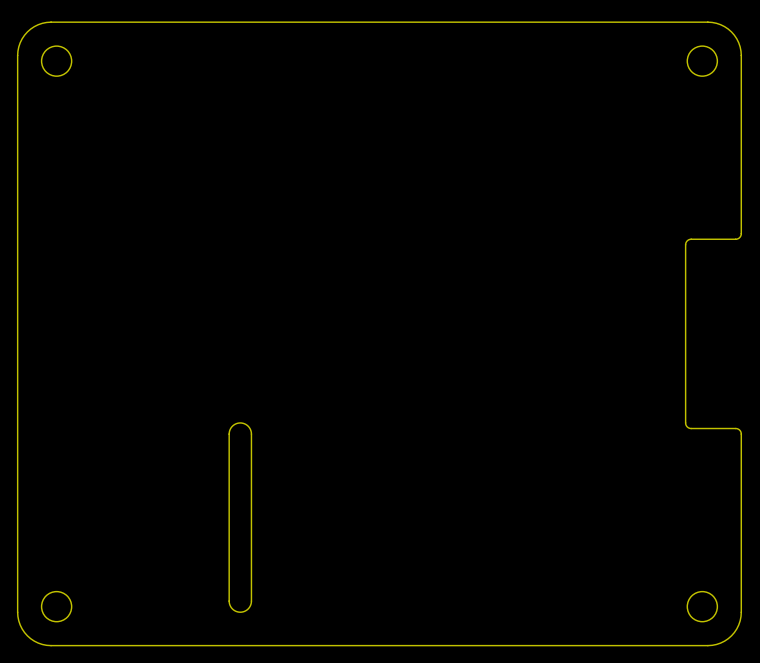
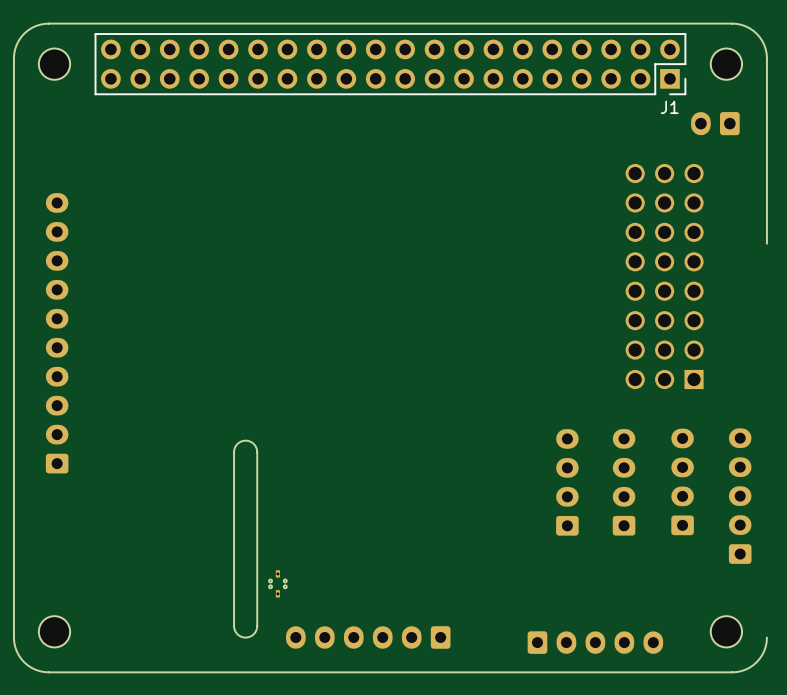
J1: none -> (390, 64)
part: none -> (715, 123)
board edge: (741, 233) (736, 239) (689, 239) (685, 244) (685, 423) (690, 428) (736, 428) (741, 432) (741, 612) -> none
part: none -> (664, 276)
part: none -> (57, 333)
part: none -> (624, 482)
part: none -> (682, 481)
part: none -> (567, 482)
part: none -> (740, 496)
part: none -> (277, 583)
part: none -> (368, 637)
part: none -> (595, 642)

